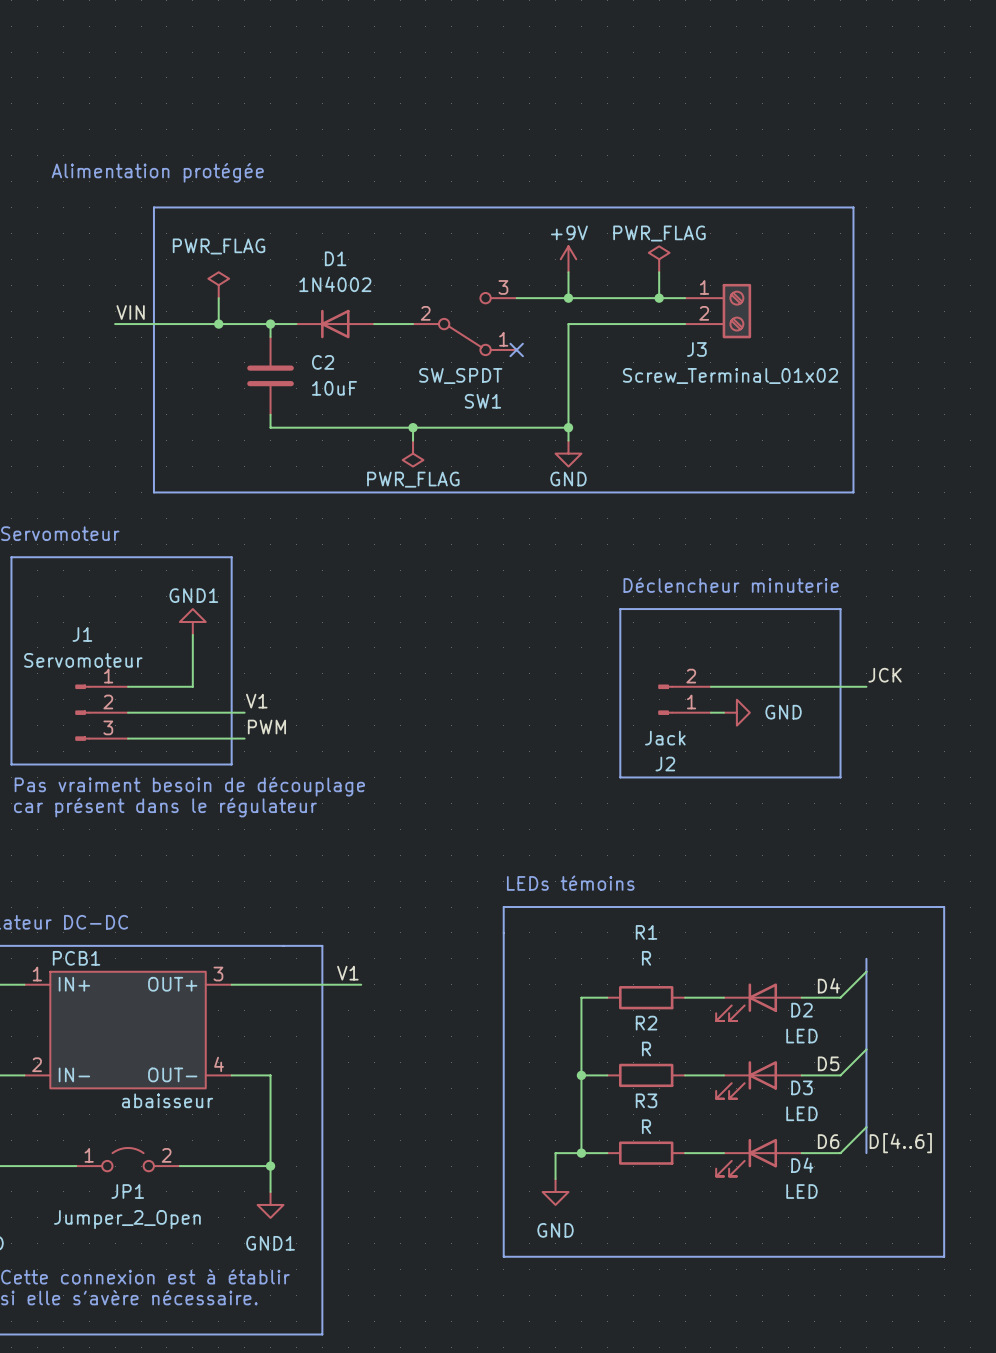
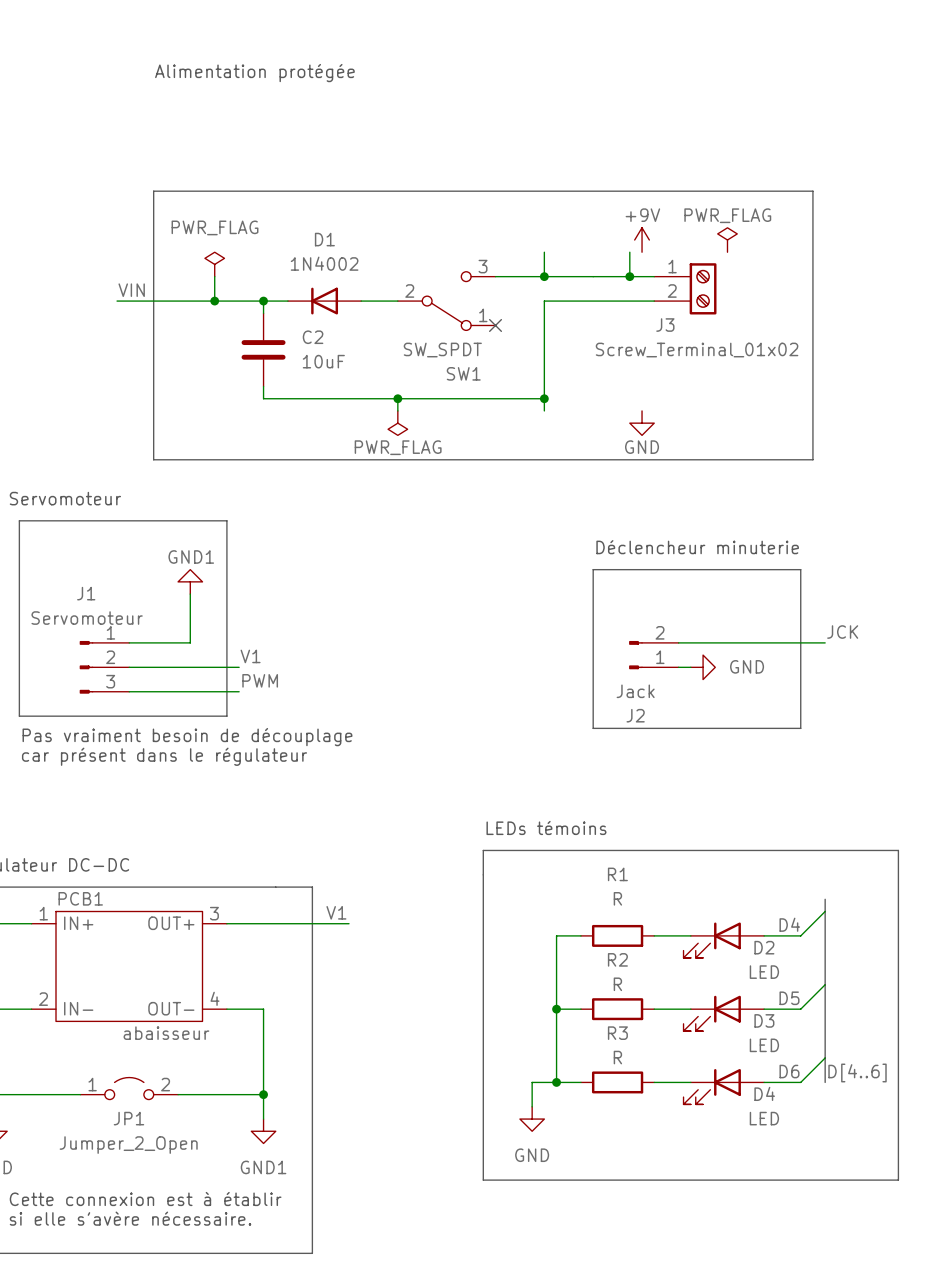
text position: Alimentation protégée (157, 172) -> Alimentation protégée (254, 73)
power symbol position: +9V (568, 259) -> +9V (642, 240)
power symbol position: PWR_FLAG (659, 259) -> PWR_FLAG (727, 240)
power symbol position: GND (568, 453) -> GND (642, 423)

